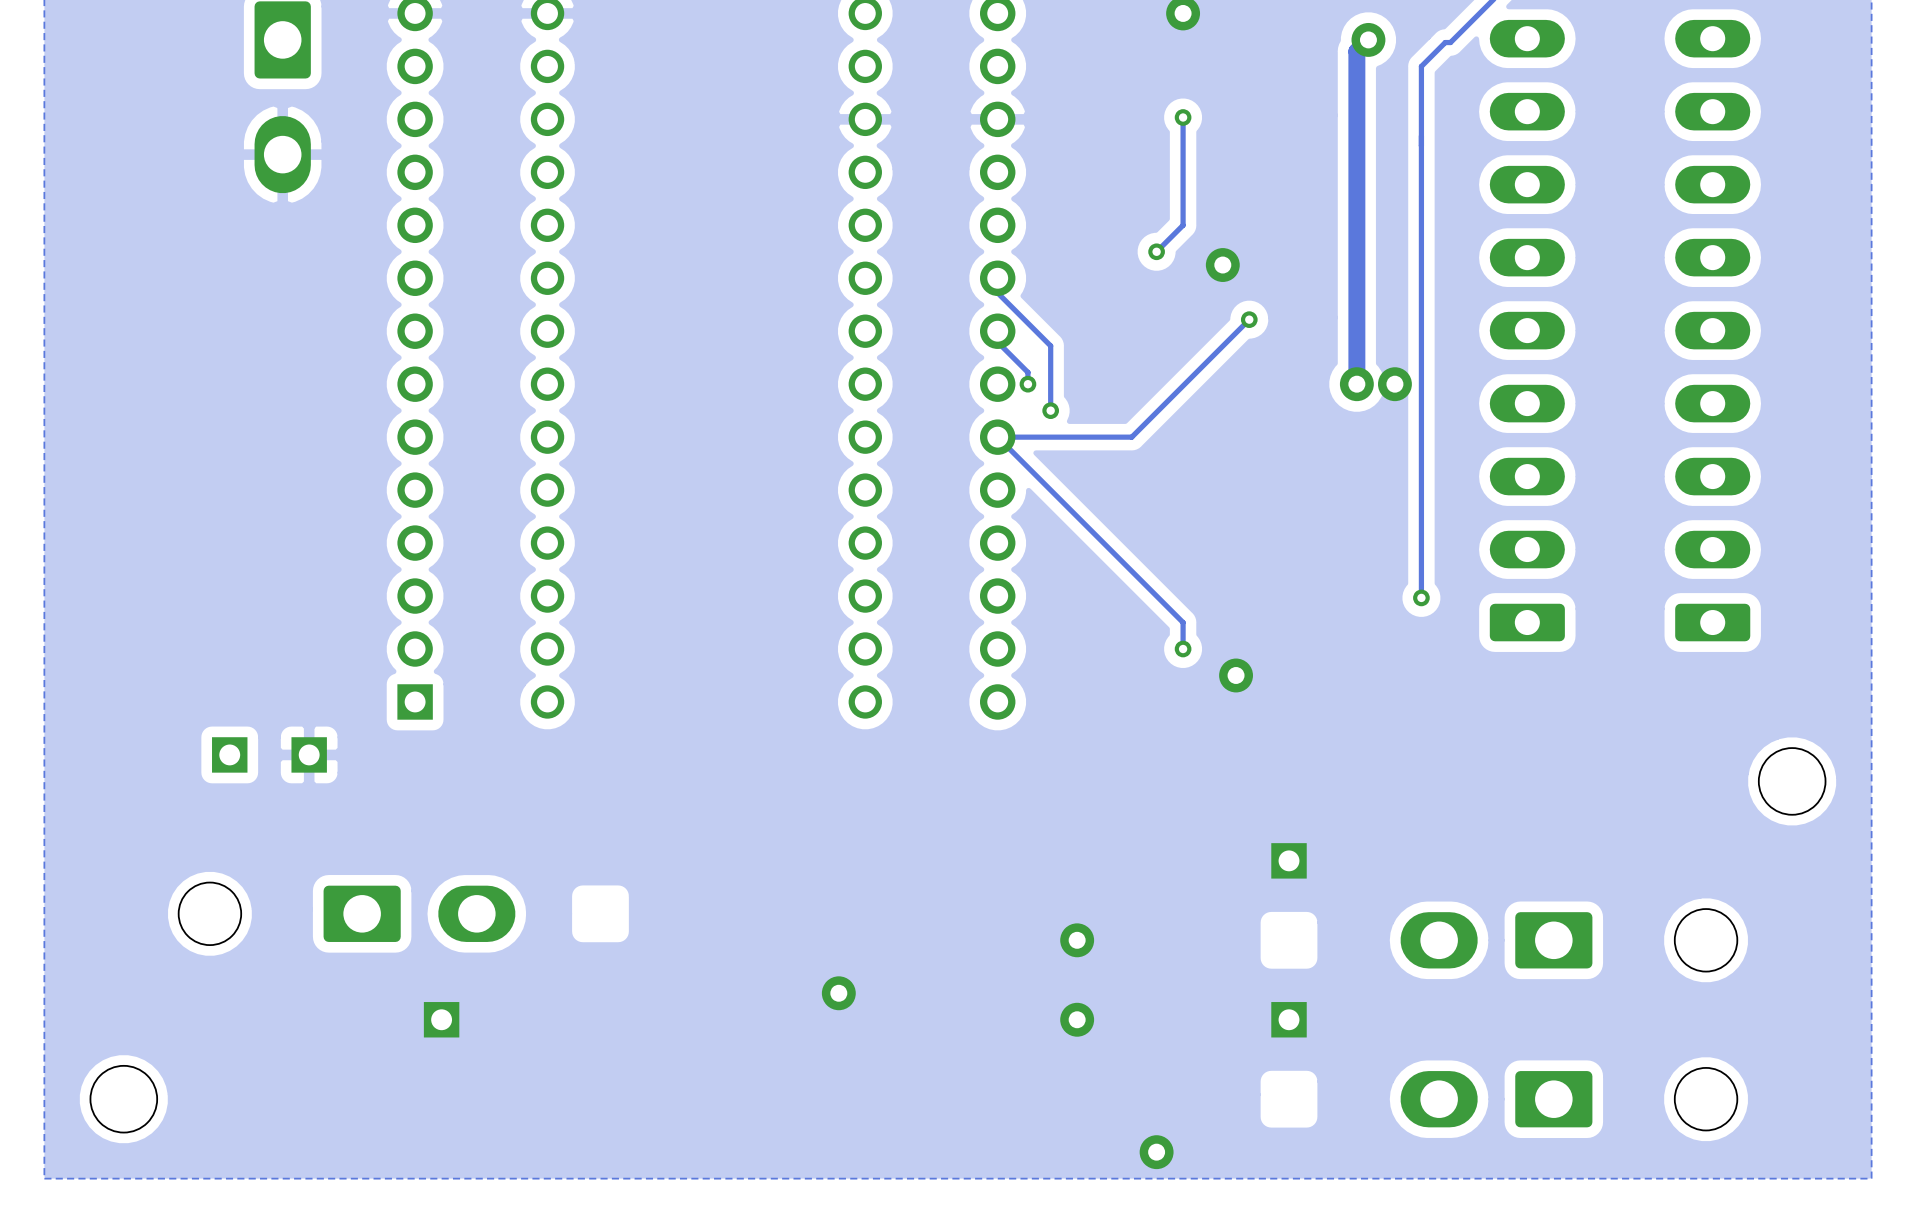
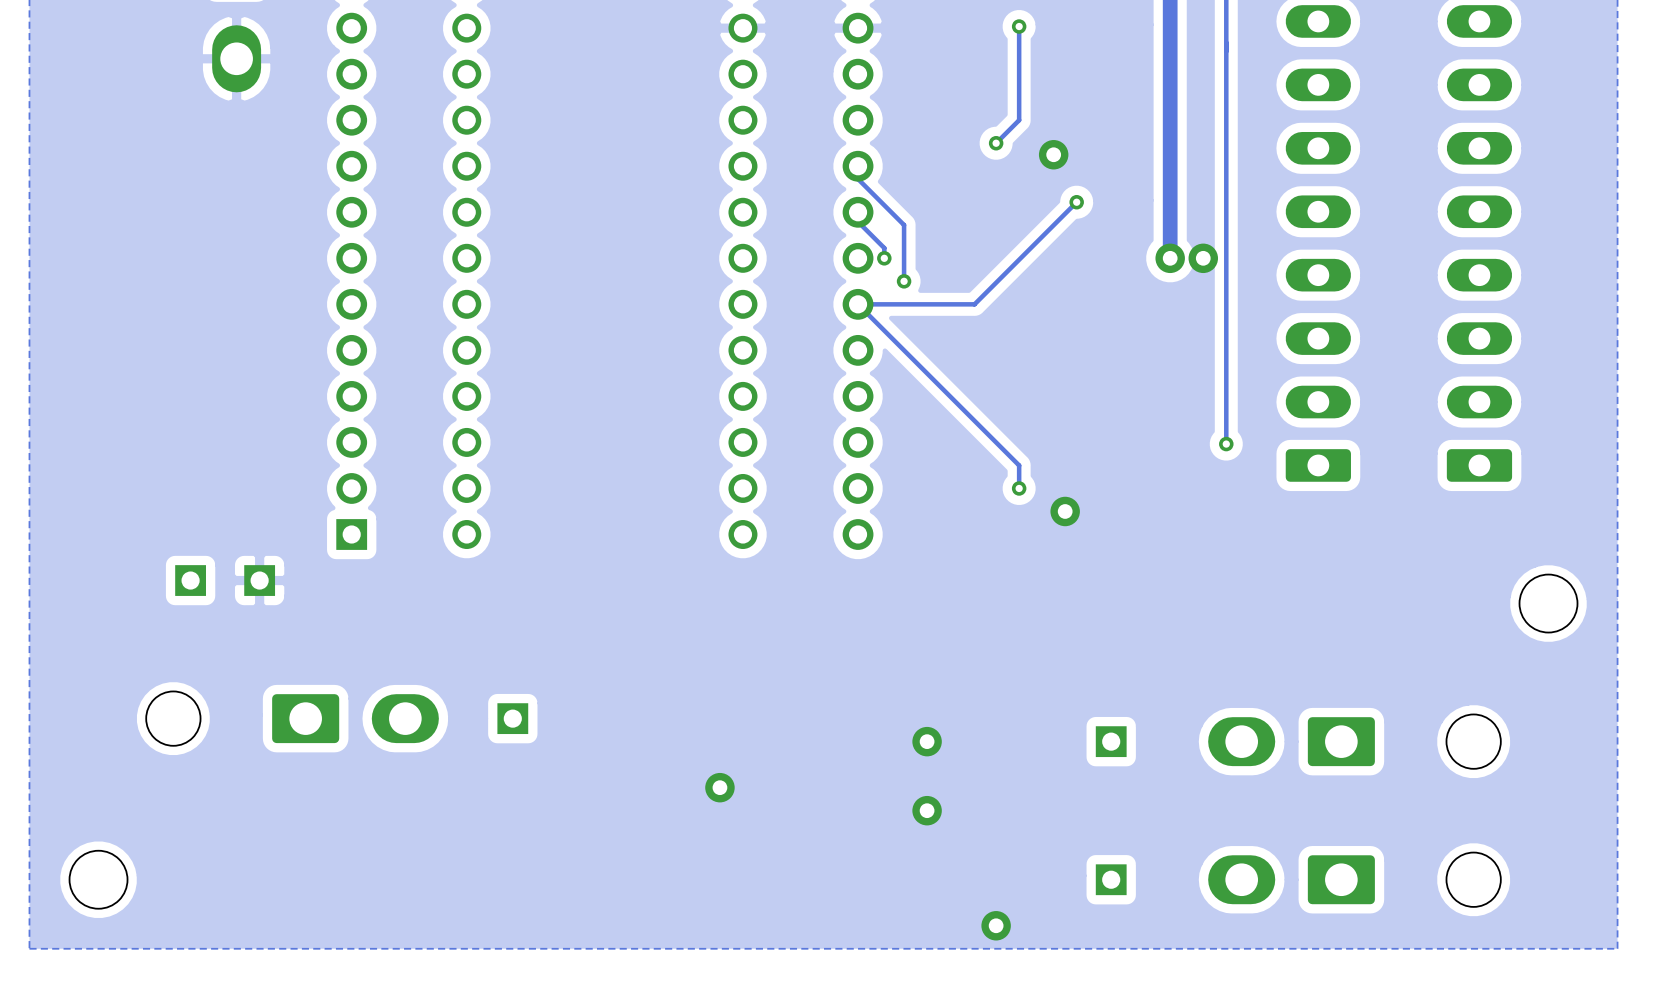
part: (1289, 860) -> none
part: none -> (1111, 741)
part position: (441, 1019) -> (512, 718)
part: (1289, 1019) -> none
part: none -> (1111, 879)

